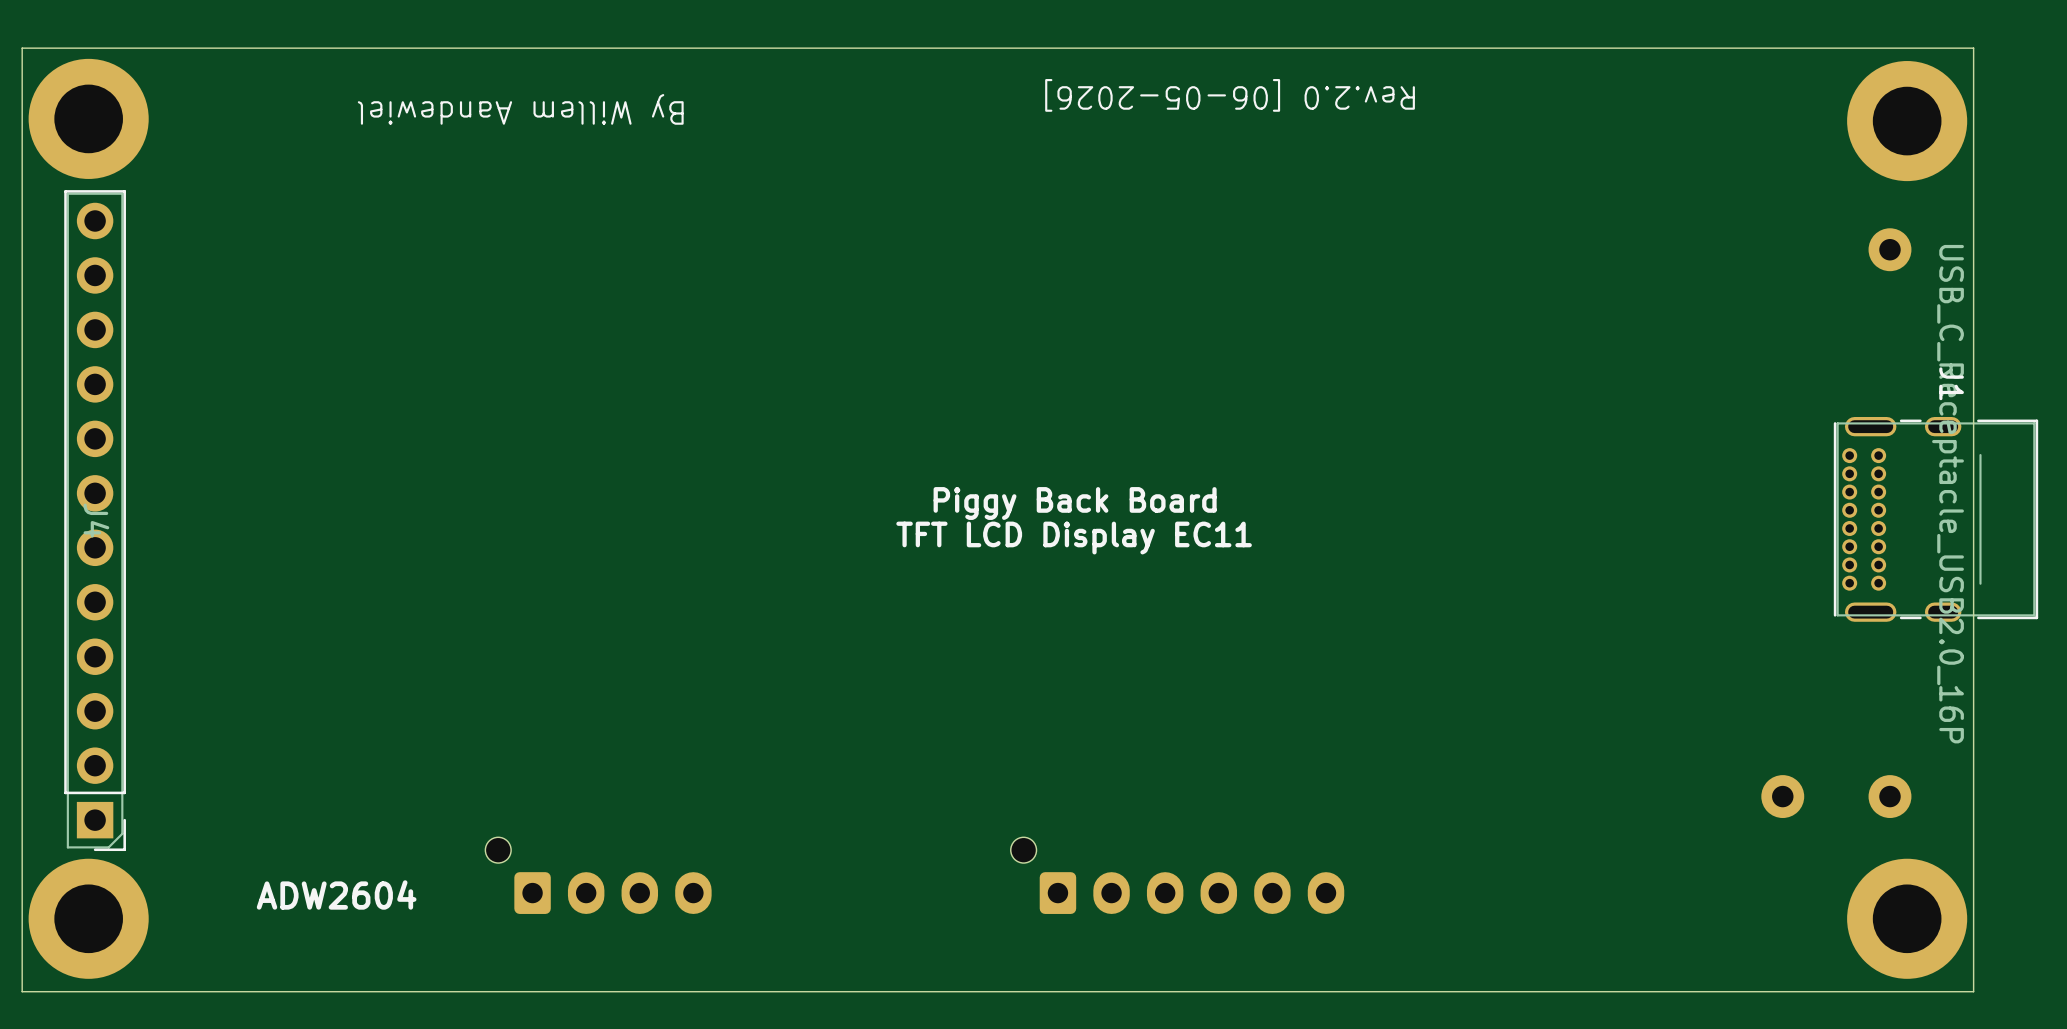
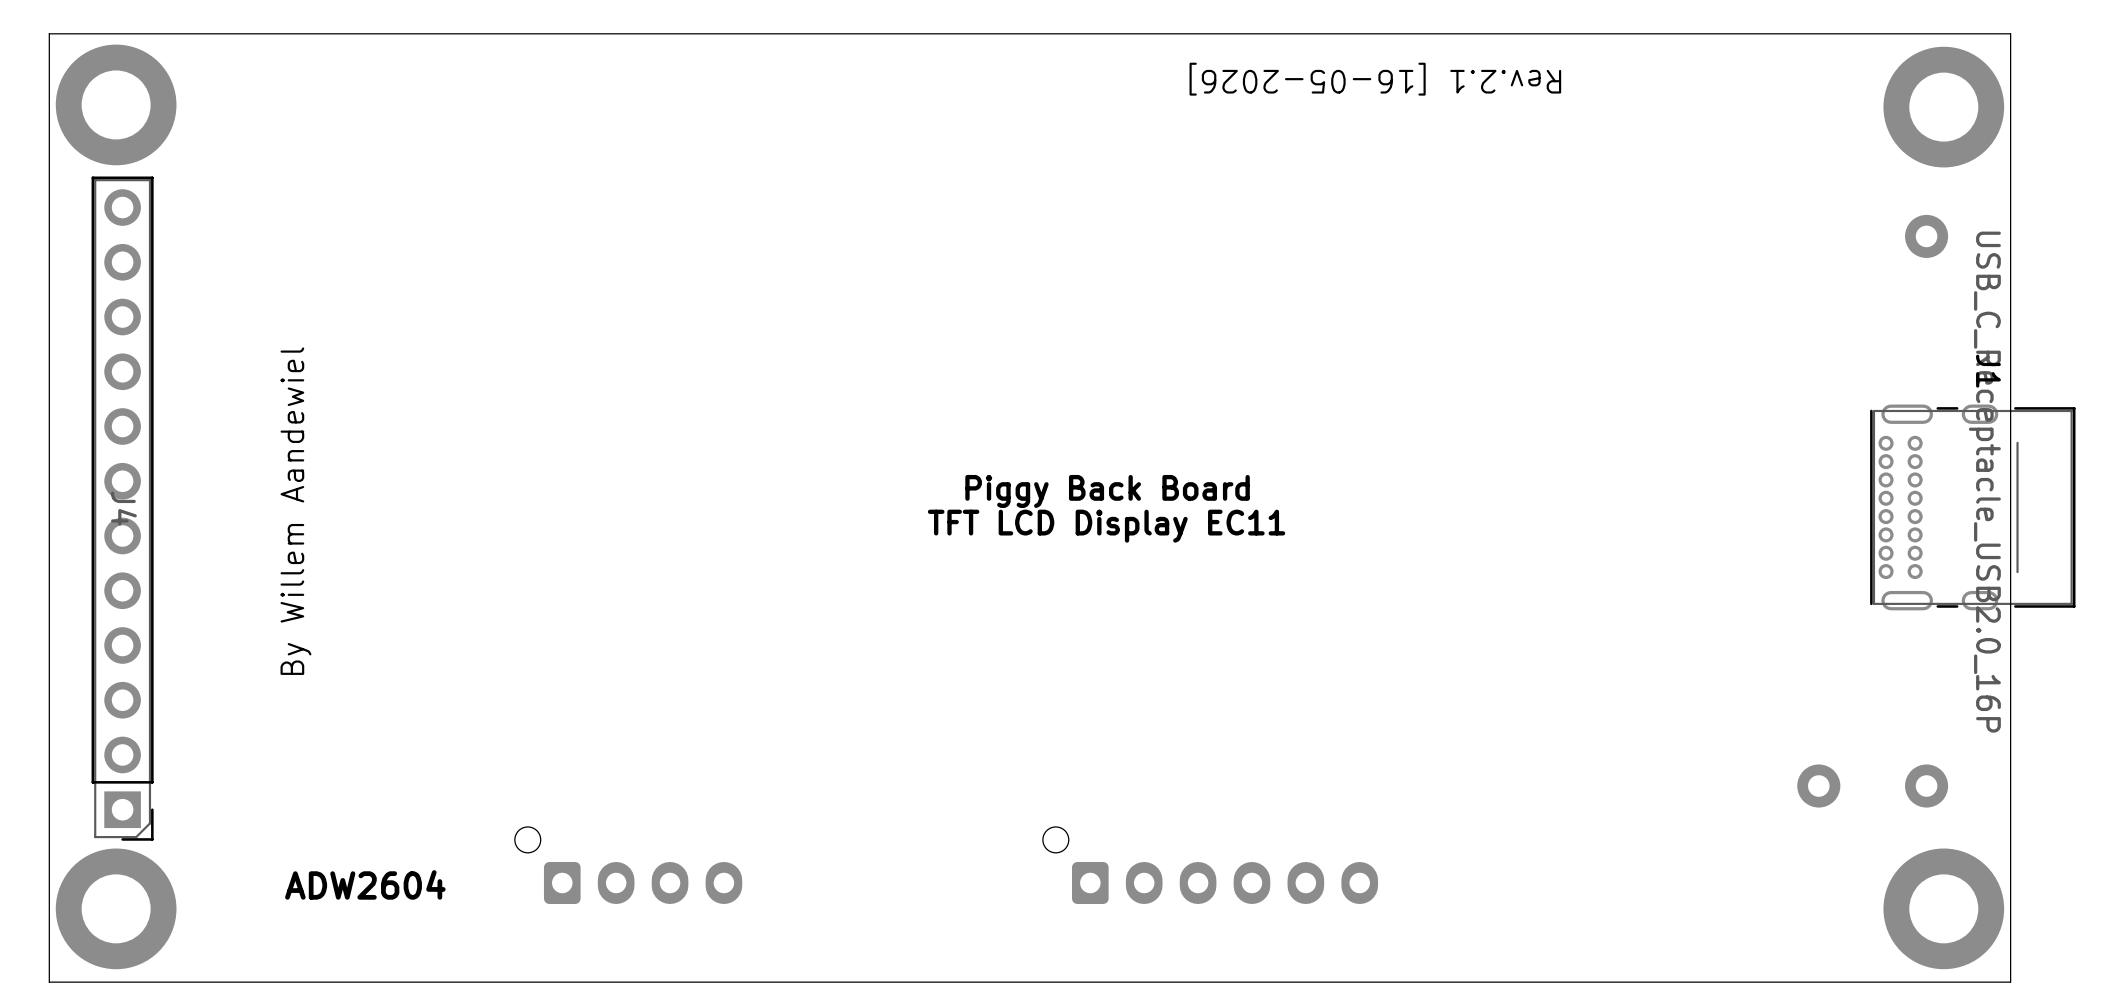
text: Rev.2.0 [06-05-2026] (1230, 95) -> Rev.2.1 [16-05-2026] (1375, 79)
text: By Willem Aandewiel (520, 109) -> none
text: none -> By Willem Aandewiel (295, 511)

